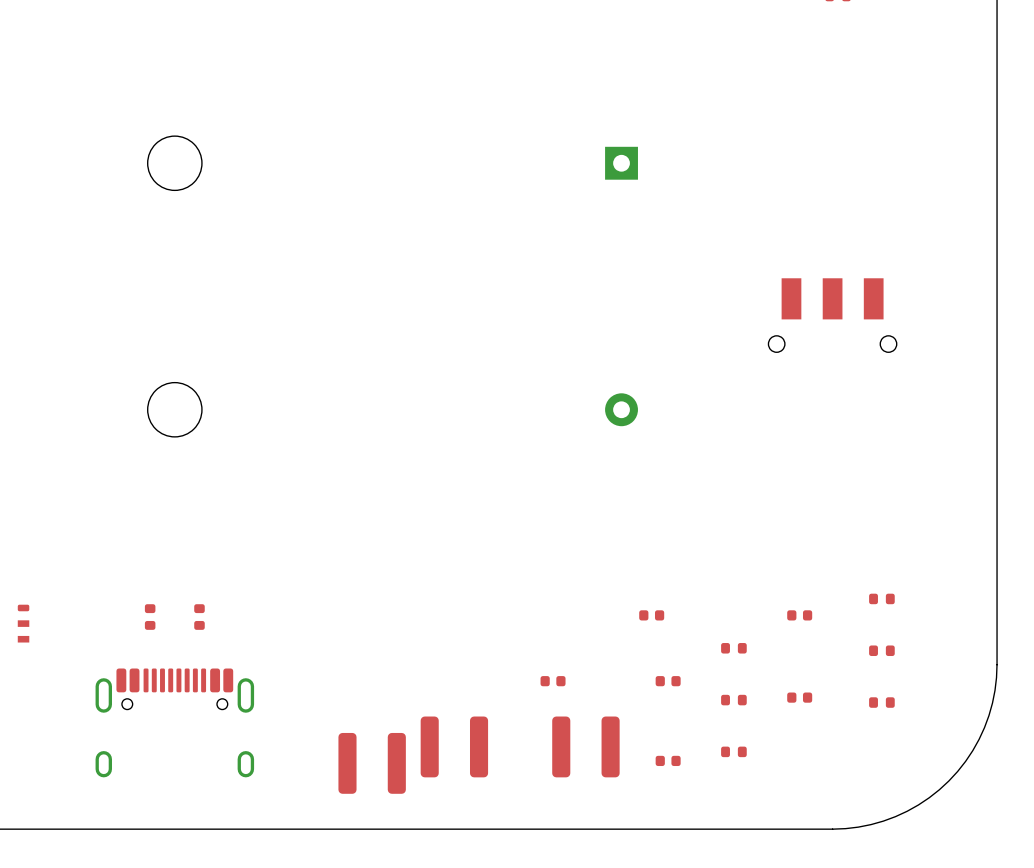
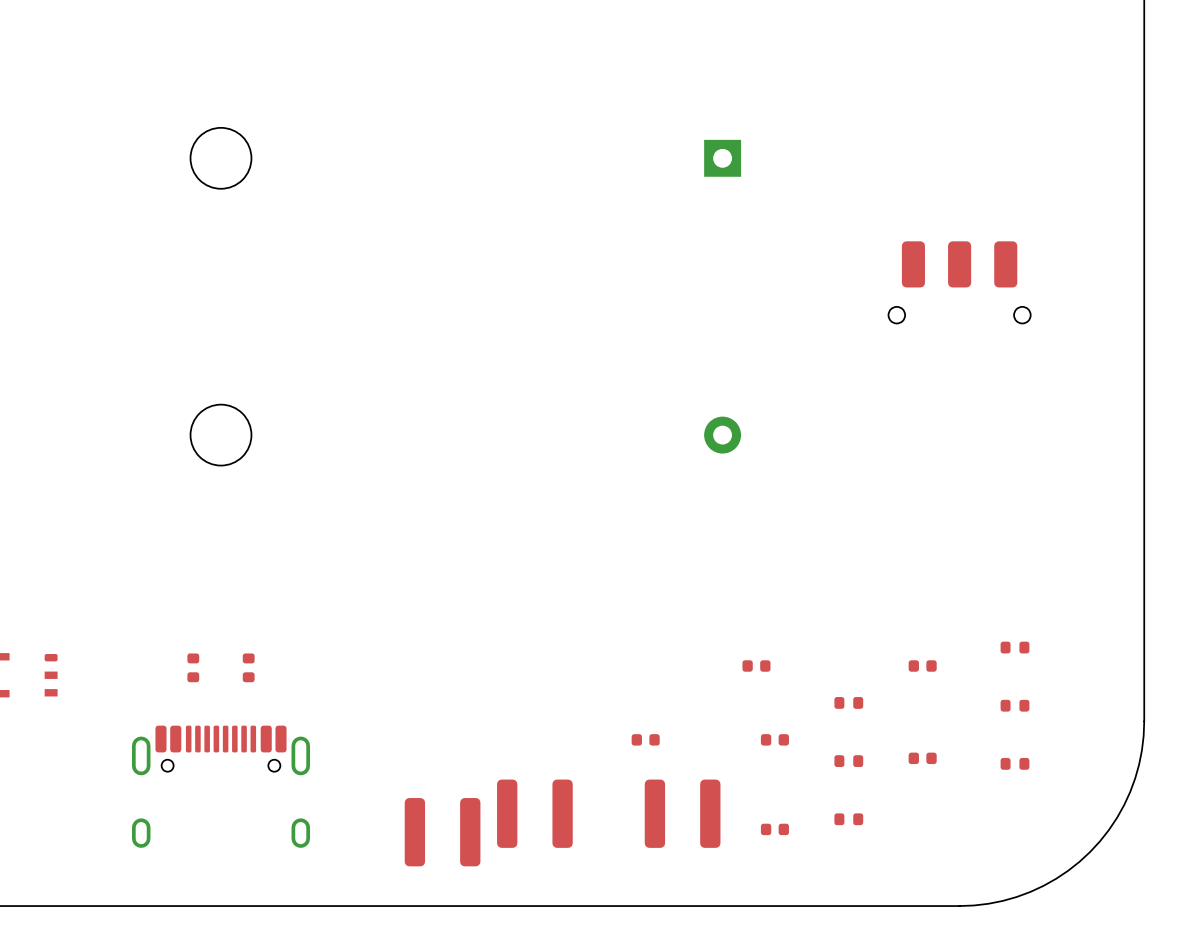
part: none -> (959, 282)
part: (832, 315) -> none

